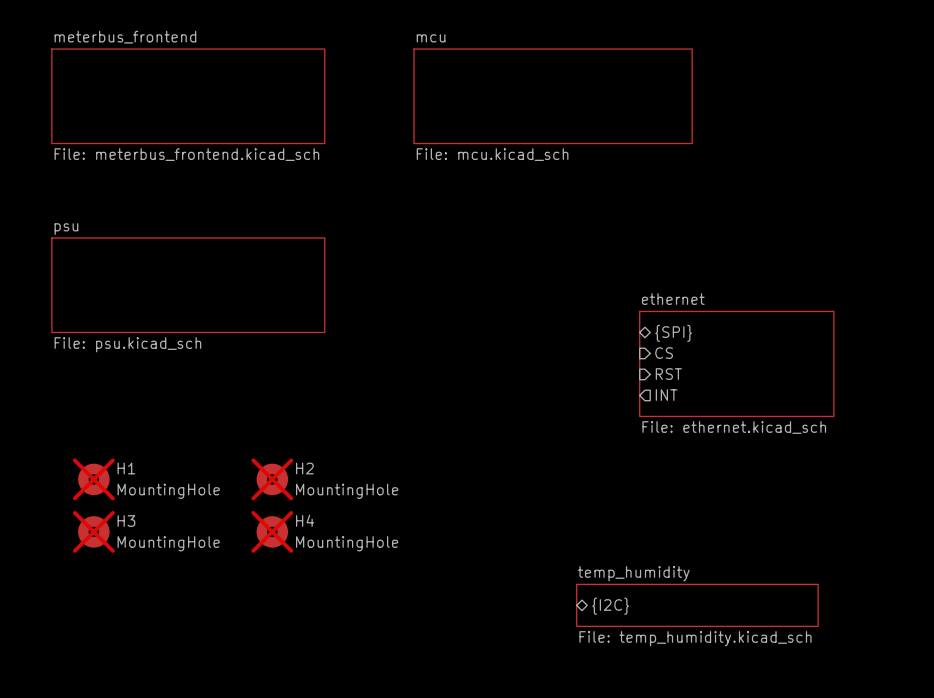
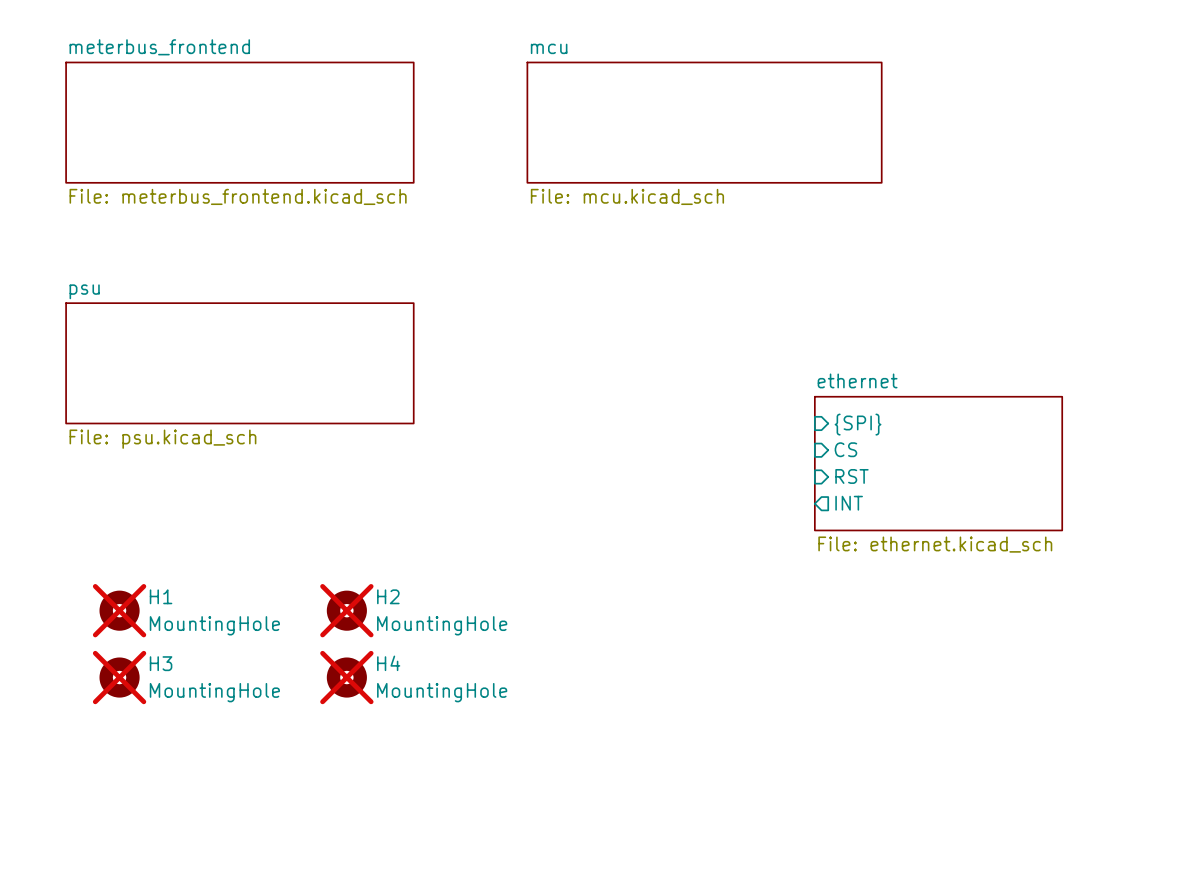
sheet pin shape: bidirectional (673, 333) -> input (858, 424)
sheet temp_humidity: File: temp_humidity.kicad_sch (697, 605) -> none
sheet pin: {I2C} (610, 606) -> none

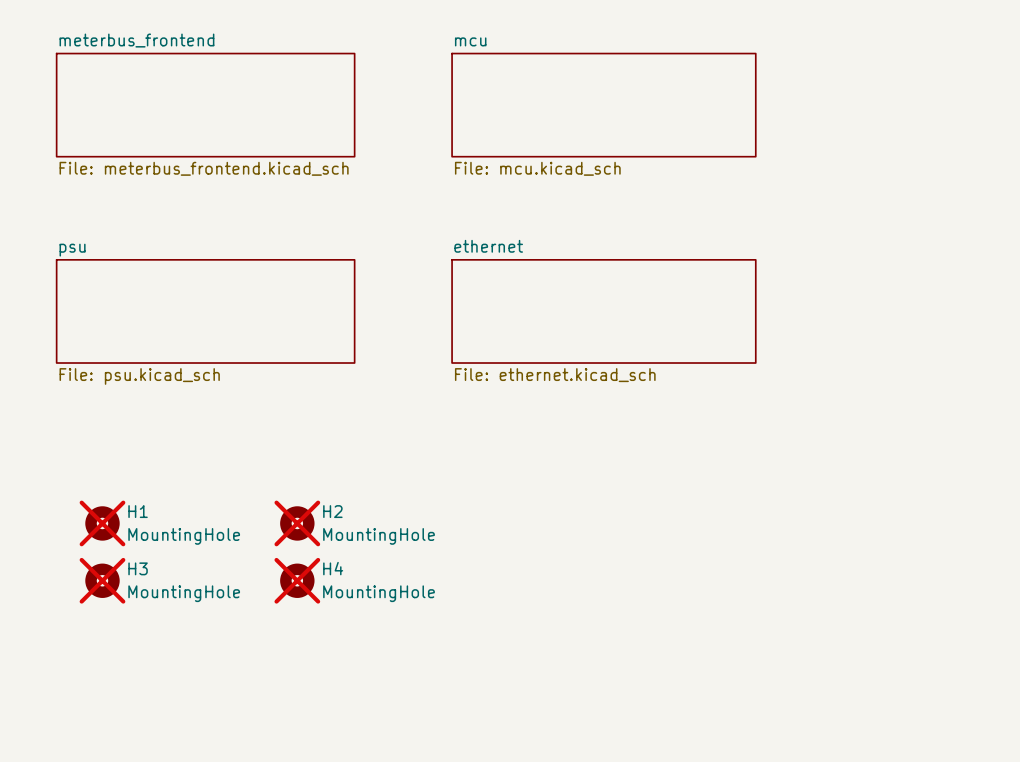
sheet ethernet: none -> File: ethernet.kicad_sch (603, 311)
sheet pin: {SPI} (858, 424) -> none
sheet pin: CS (845, 449) -> none
sheet ethernet: File: ethernet.kicad_sch (938, 463) -> none
sheet pin: RST (851, 476) -> none
sheet pin: INT (849, 503) -> none

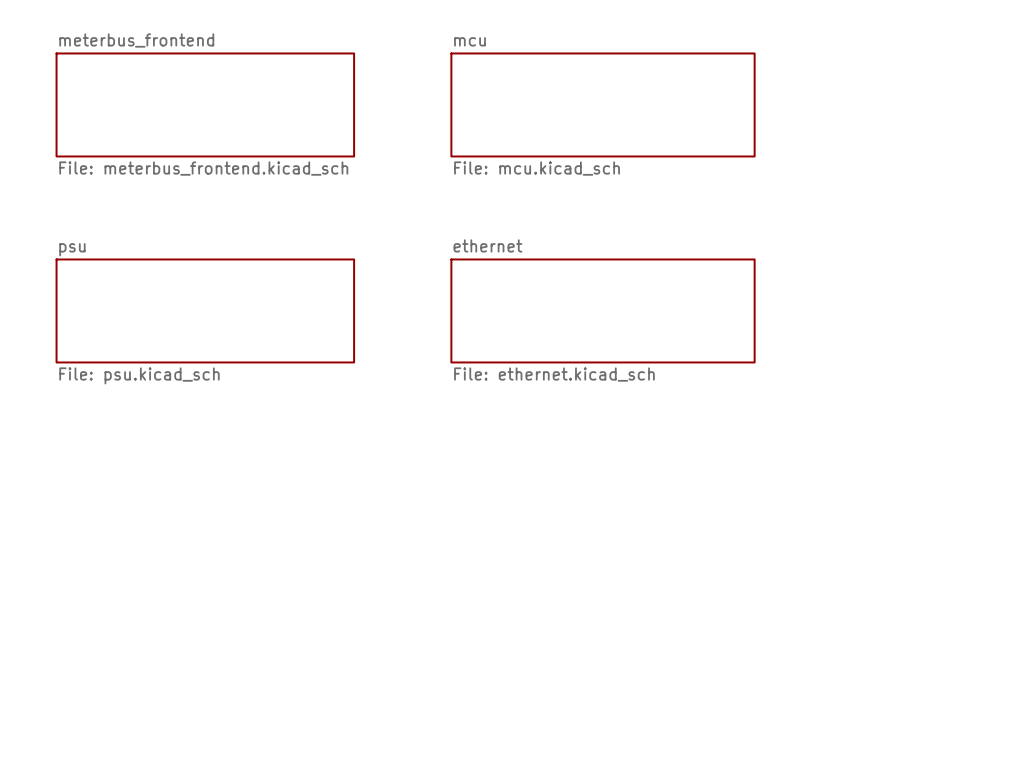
H1: MountingHole (102, 523) -> none
H2: MountingHole (297, 523) -> none
H3: MountingHole (102, 580) -> none
H4: MountingHole (297, 580) -> none

